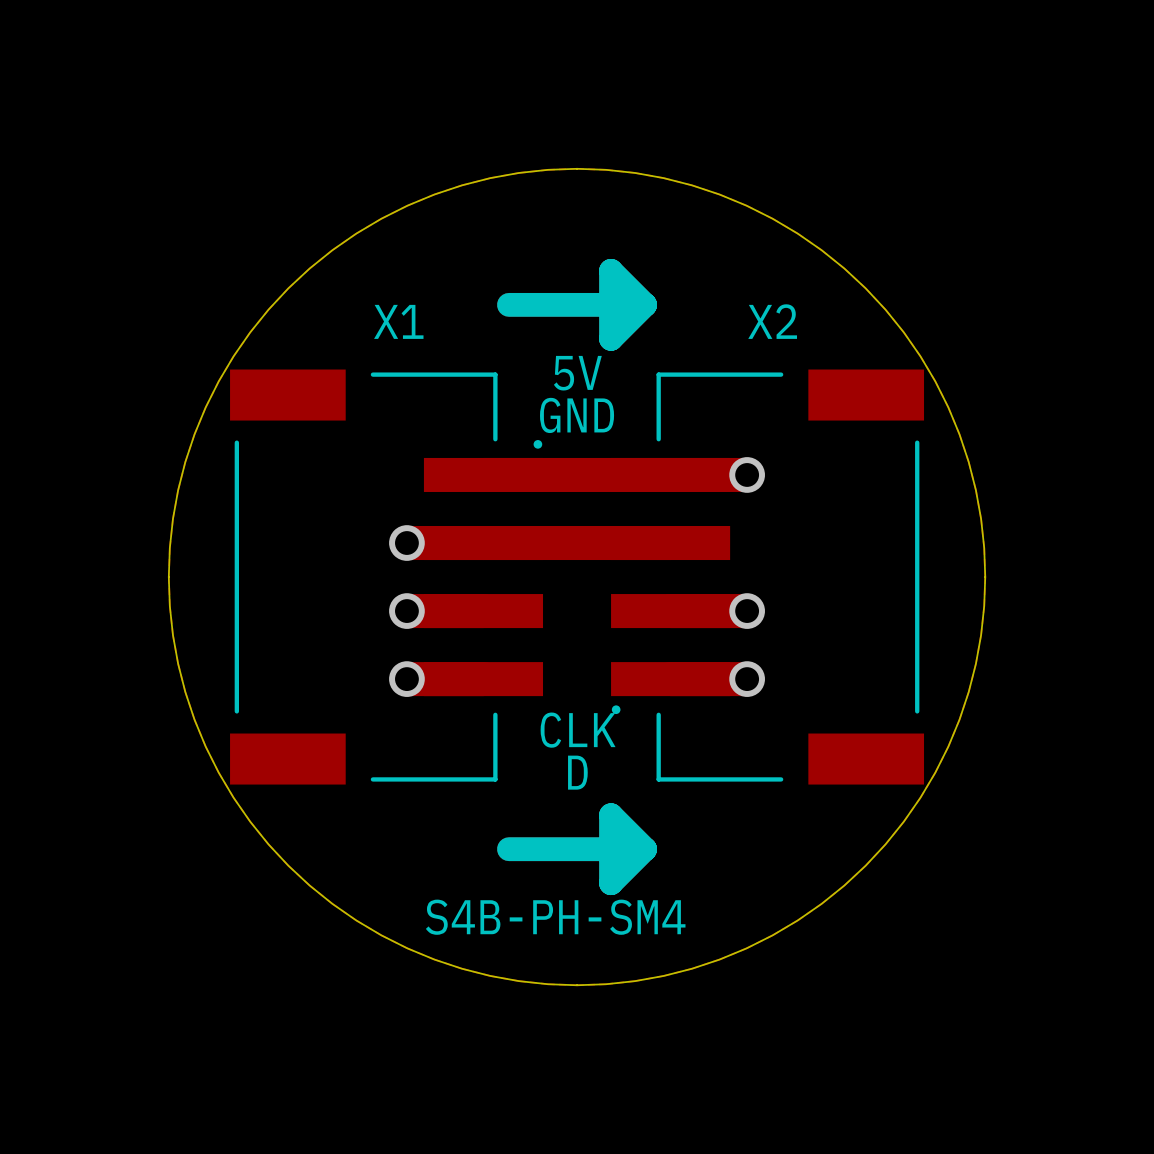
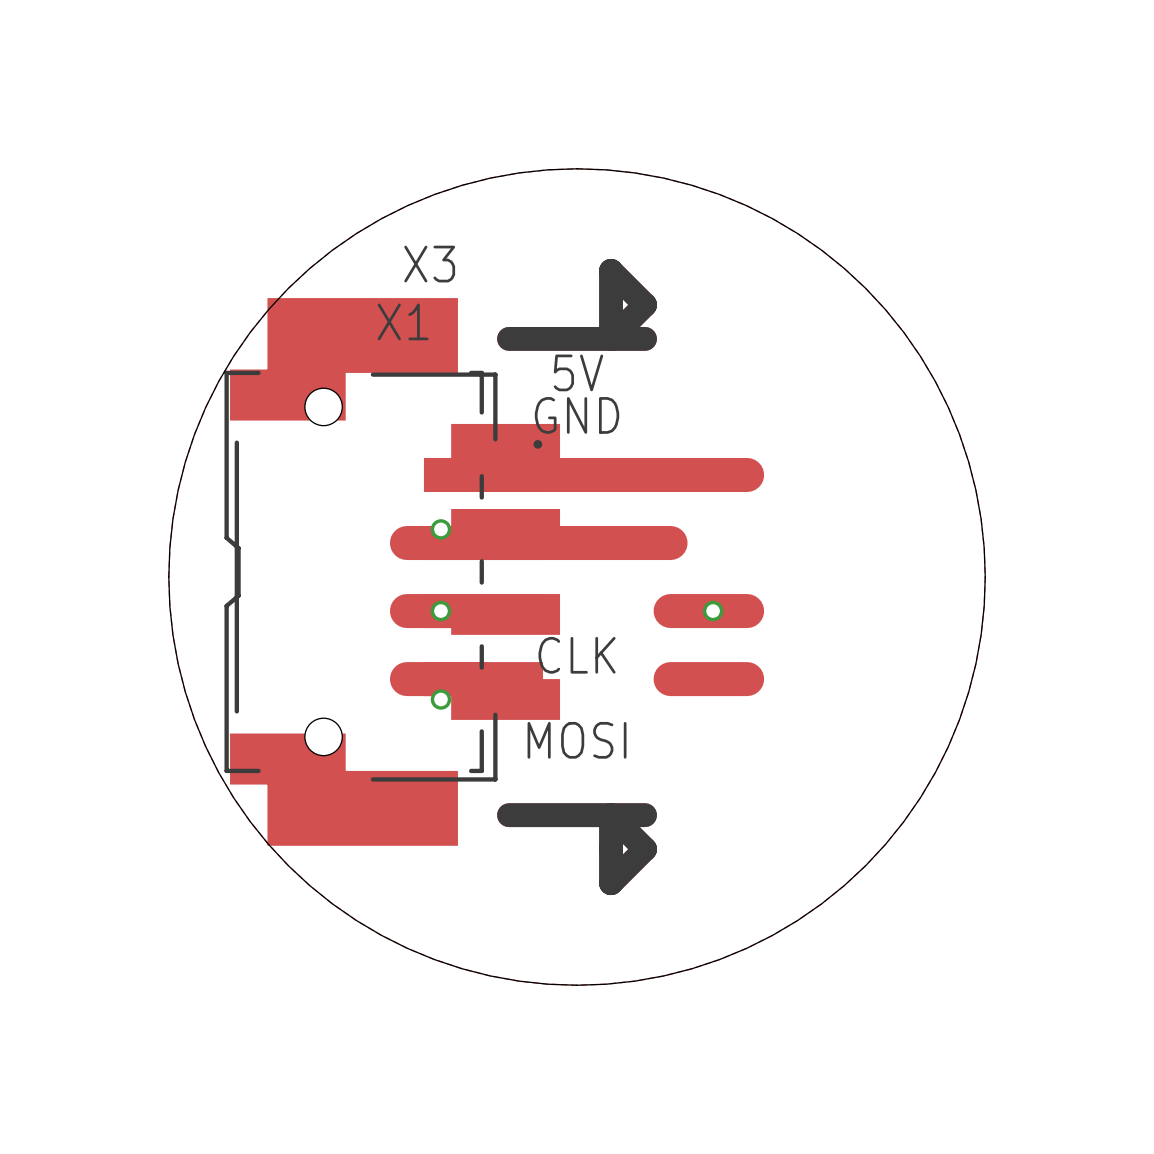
line: (508, 304) (645, 304) -> (508, 338) (645, 338)
via: (747, 474) -> none
via: none -> (440, 529)
via: (406, 543) -> none
X3: none -> (392, 571)
X2: S4B-PH-SM4 (767, 577) -> none
via: (406, 611) -> none
via: none -> (440, 611)
via: none -> (713, 611)
via: (747, 611) -> none
via: (406, 679) -> none
via: (747, 679) -> none
via: none -> (440, 699)
text position: CLK (578, 730) -> CLK (577, 655)
text: D (577, 772) -> MOSI (577, 740)
line: (508, 849) (645, 849) -> (508, 815) (645, 815)

